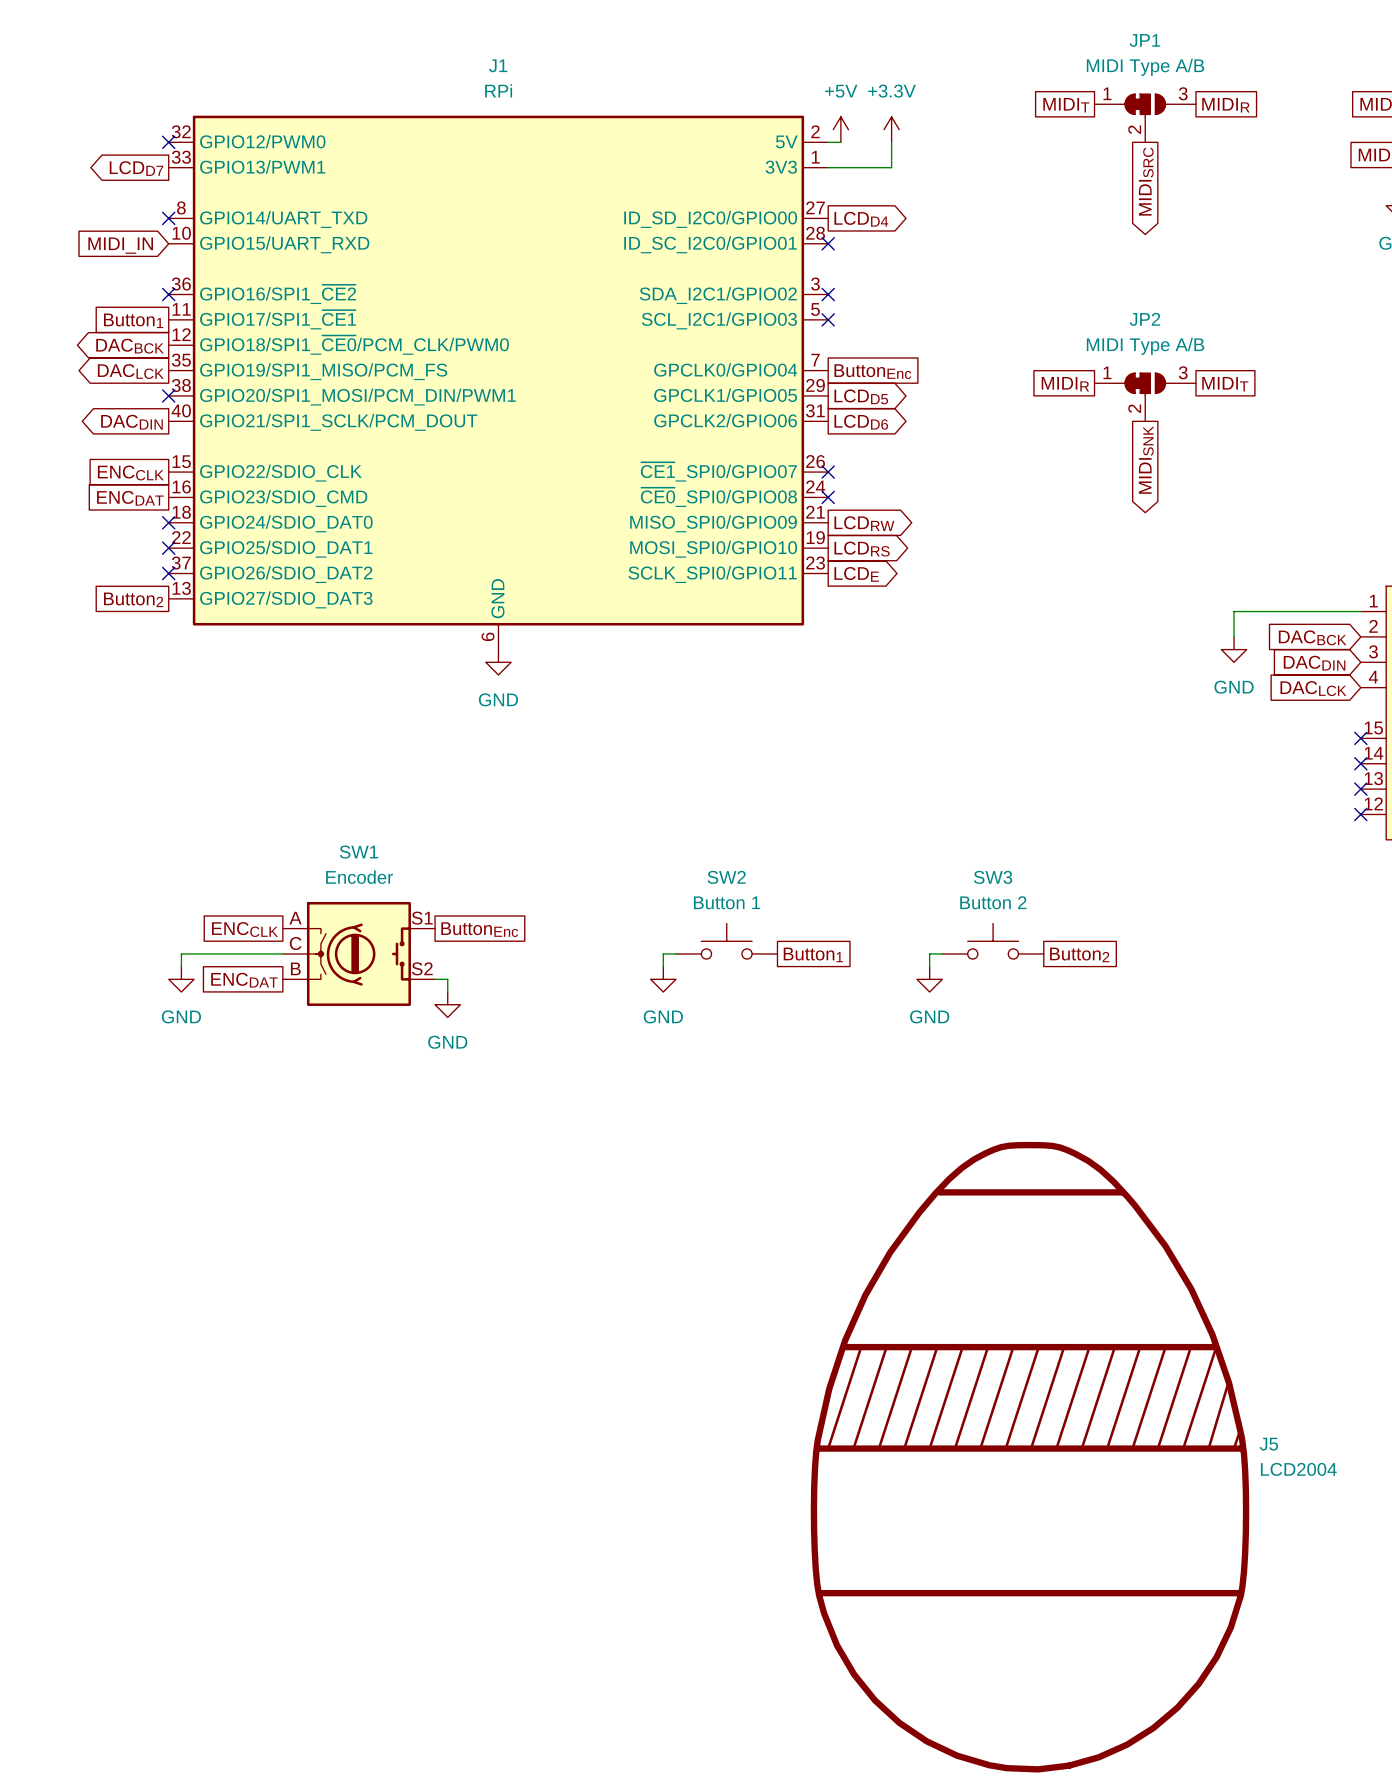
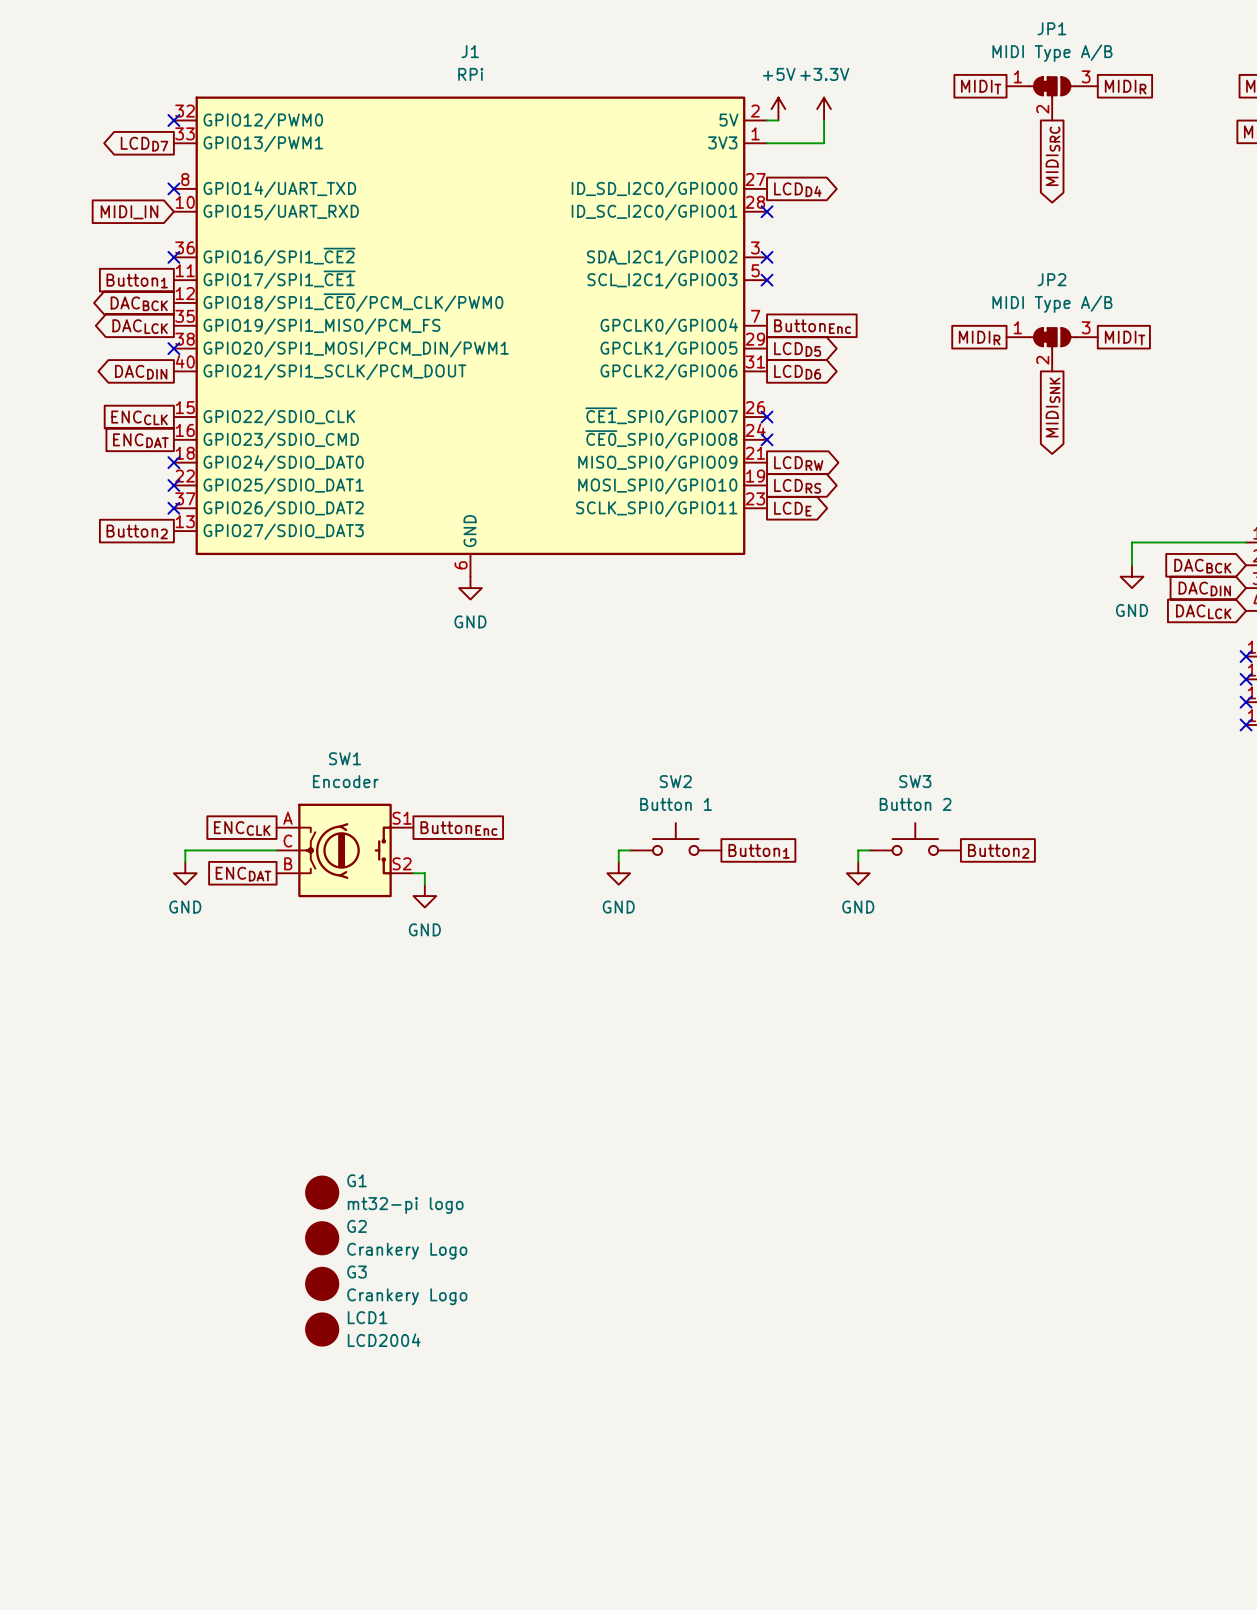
G1: none -> mt32-pi logo (322, 1192)
G2: none -> Crankery Logo (322, 1238)
G3: none -> Crankery Logo (322, 1283)
J5: LCD2004 (1030, 1457) -> none
LCD1: none -> LCD2004 (322, 1329)

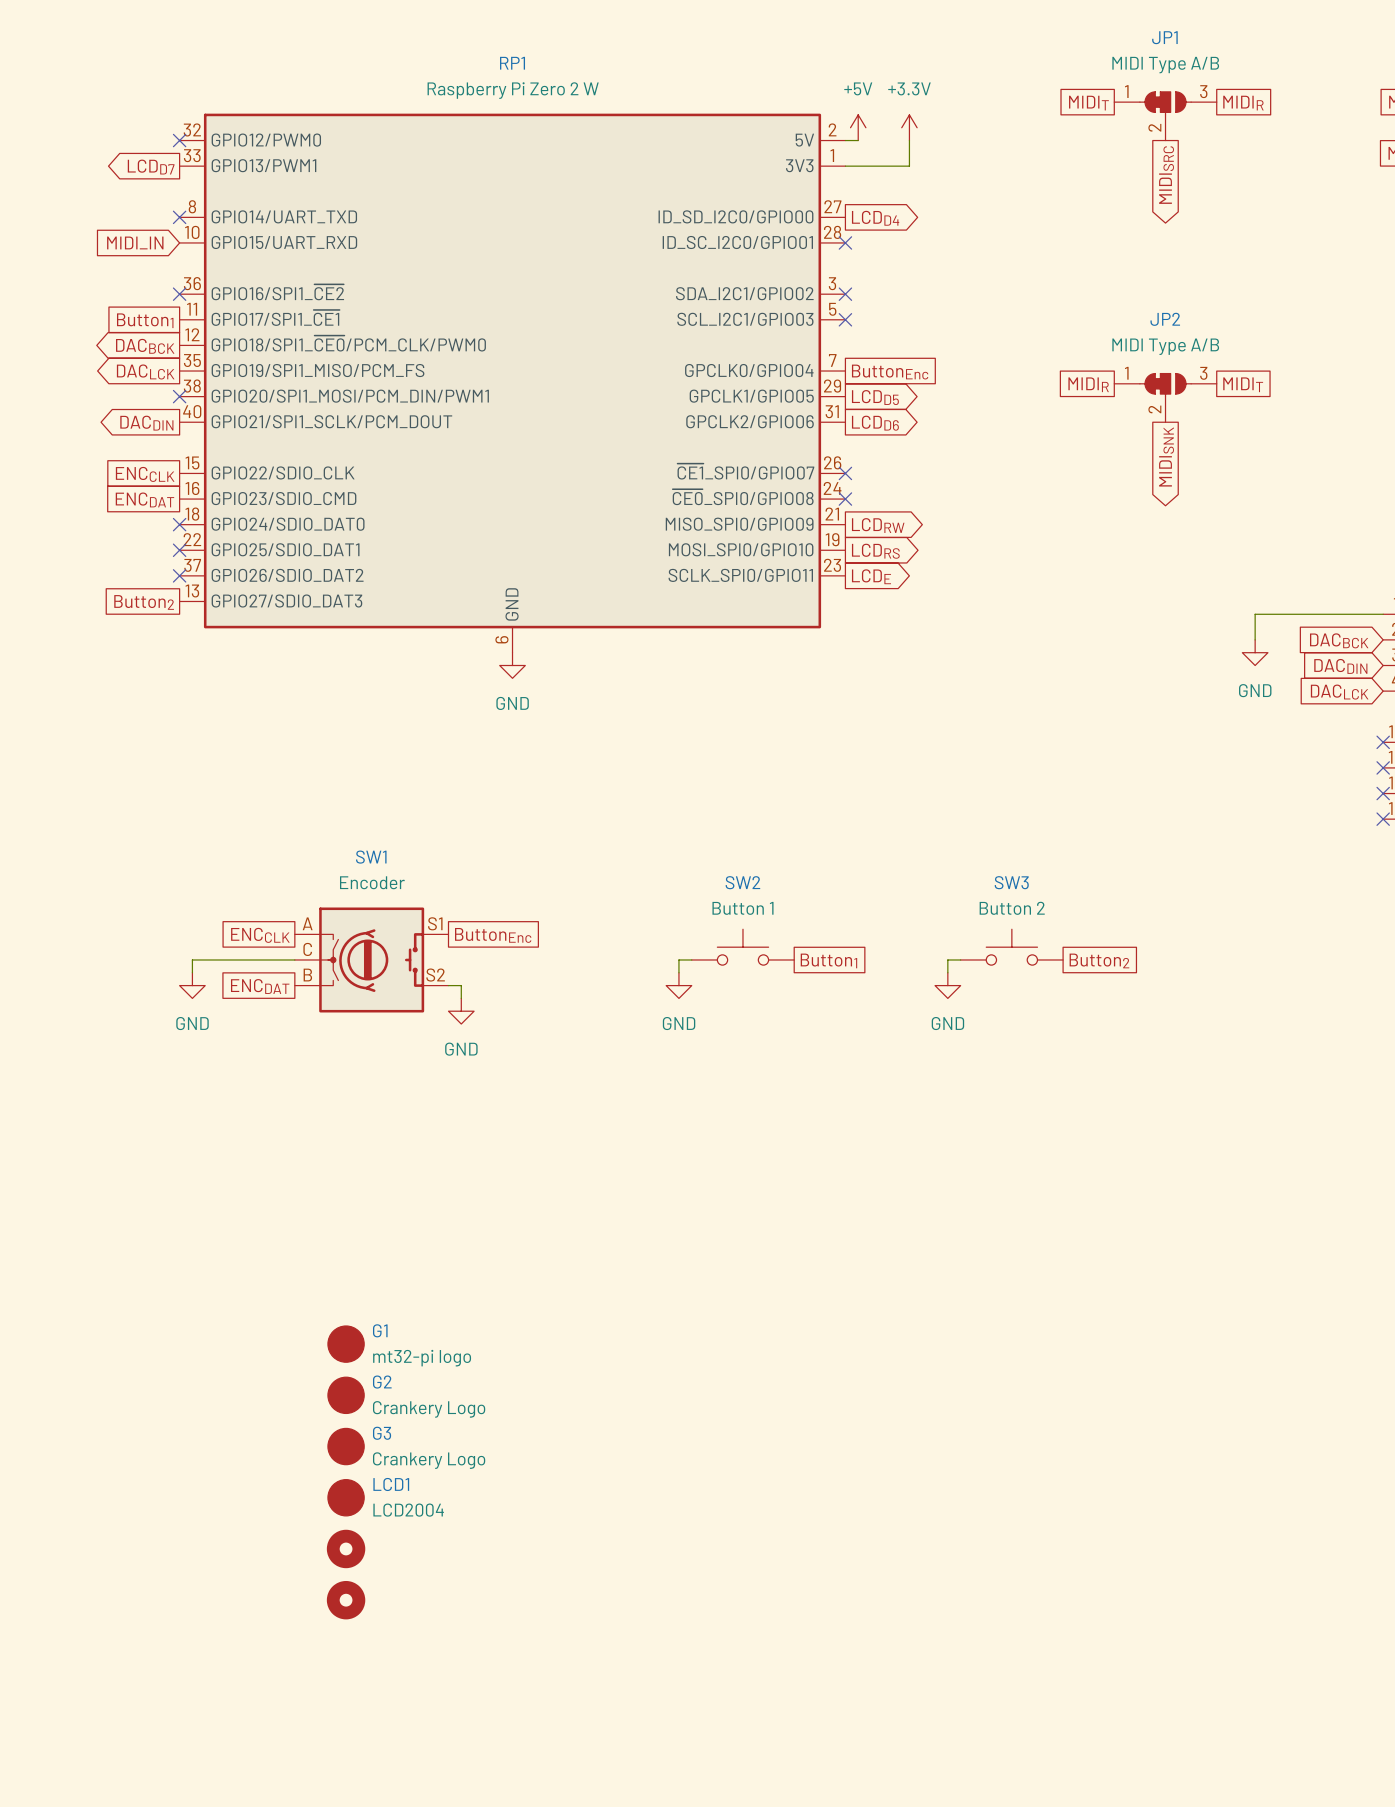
J1 name: J1 (470, 51) -> RP1 (512, 63)
J1 value: RPi (470, 74) -> Raspberry Pi Zero 2 W (513, 90)
part: none -> (346, 1548)
part: none -> (346, 1600)

